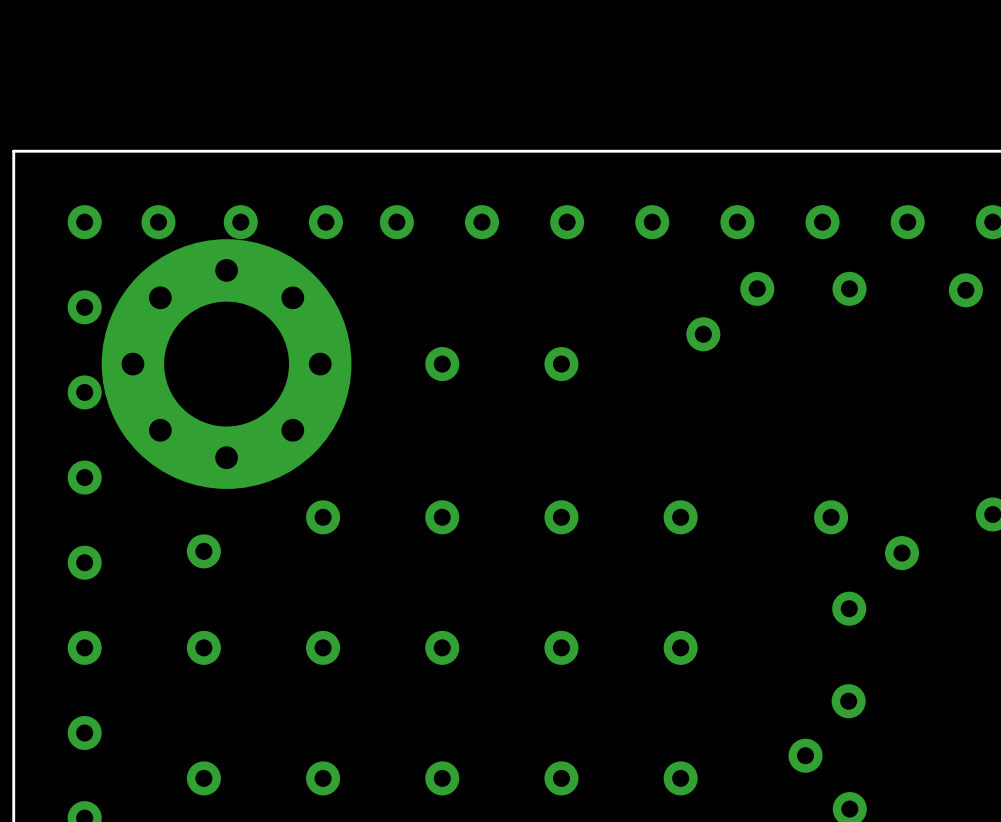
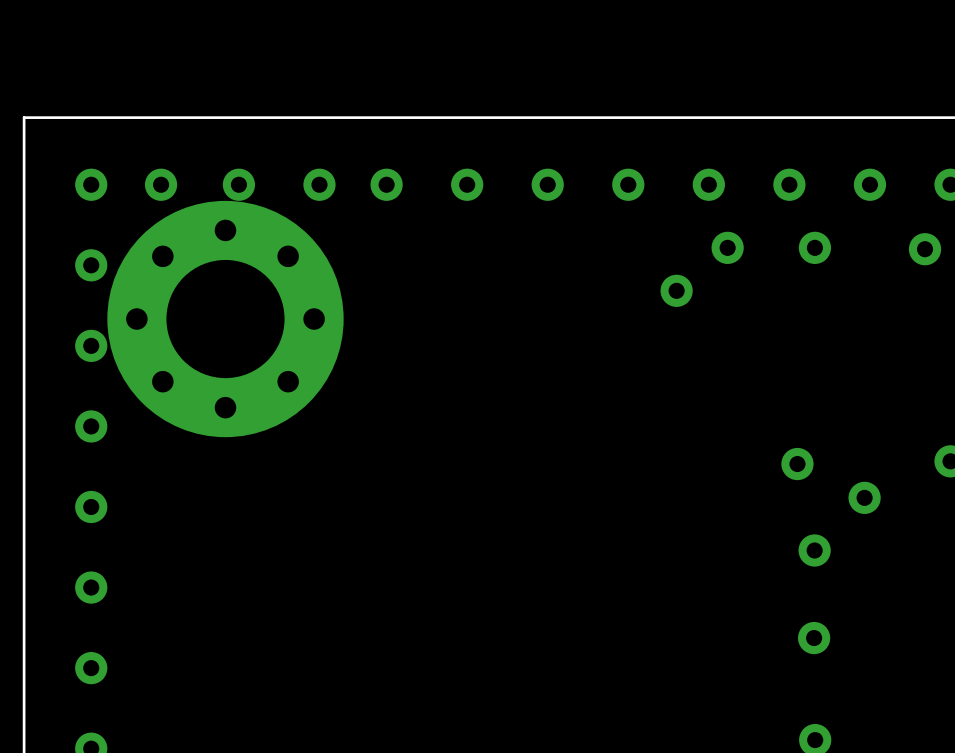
via: (442, 364) -> none
via: (561, 364) -> none
via: (323, 517) -> none
via: (442, 517) -> none
via: (561, 517) -> none
via: (680, 517) -> none
via: (203, 551) -> none
via: (203, 647) -> none
via: (323, 647) -> none
via: (442, 647) -> none
via: (561, 647) -> none
via: (680, 647) -> none
via: (805, 755) -> none
via: (203, 778) -> none
via: (323, 778) -> none
via: (442, 778) -> none
via: (561, 778) -> none
via: (680, 778) -> none

